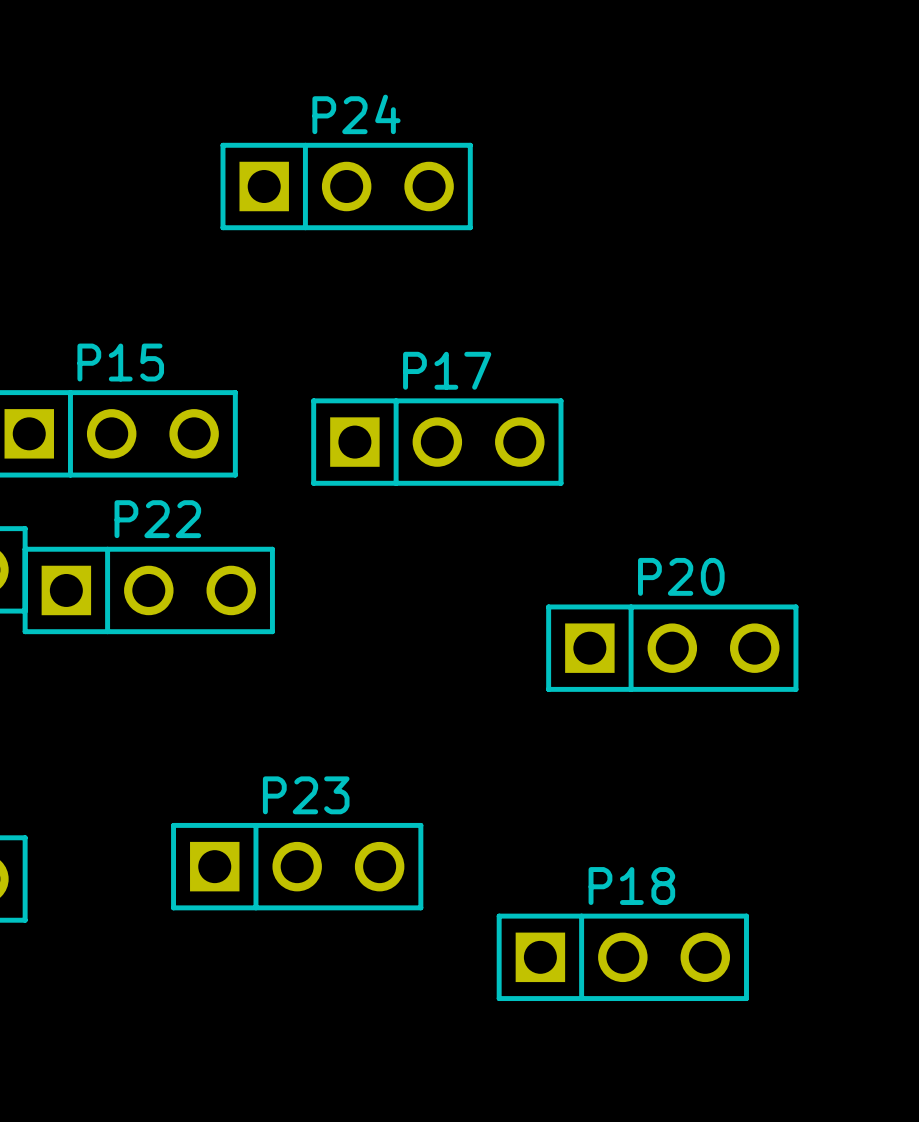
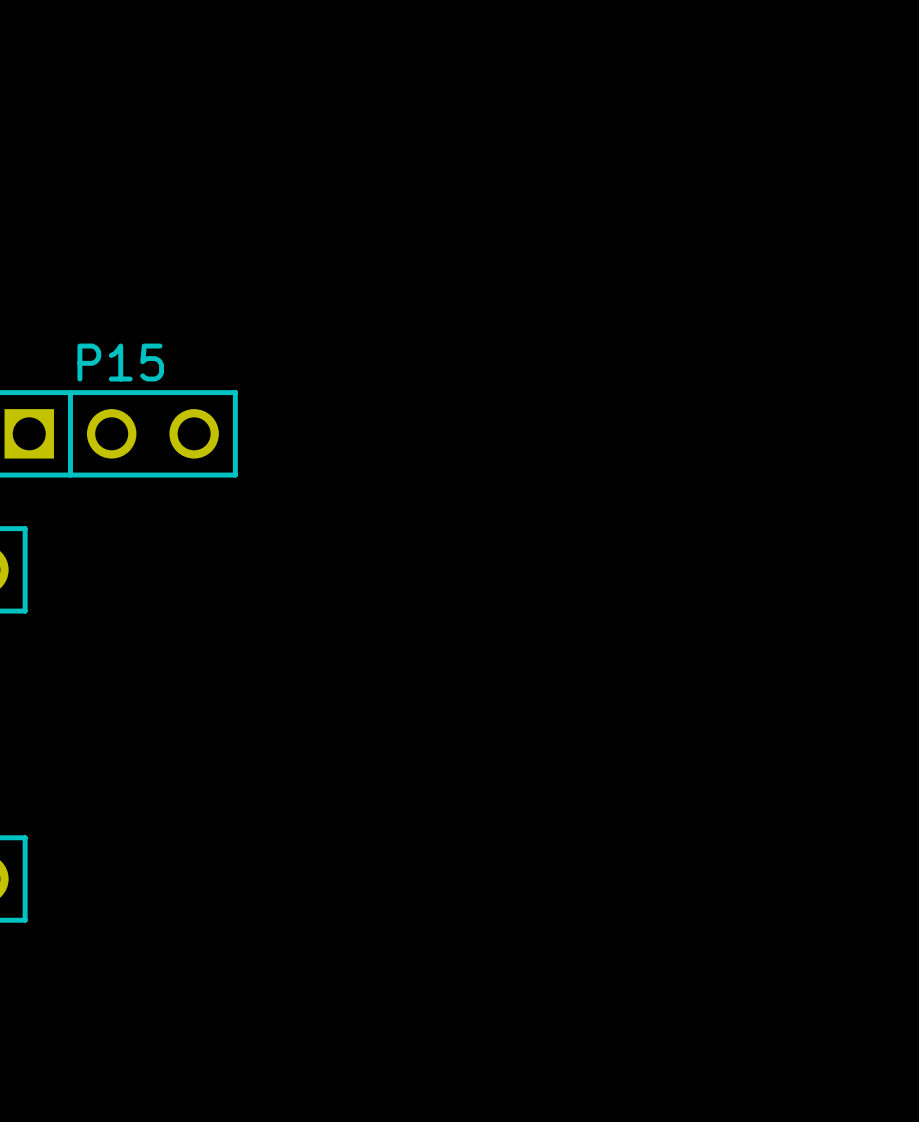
P24: (346, 186) -> none
P17: (437, 442) -> none
P22: (148, 590) -> none
P20: (672, 648) -> none
P23: (297, 866) -> none
P18: (622, 957) -> none

